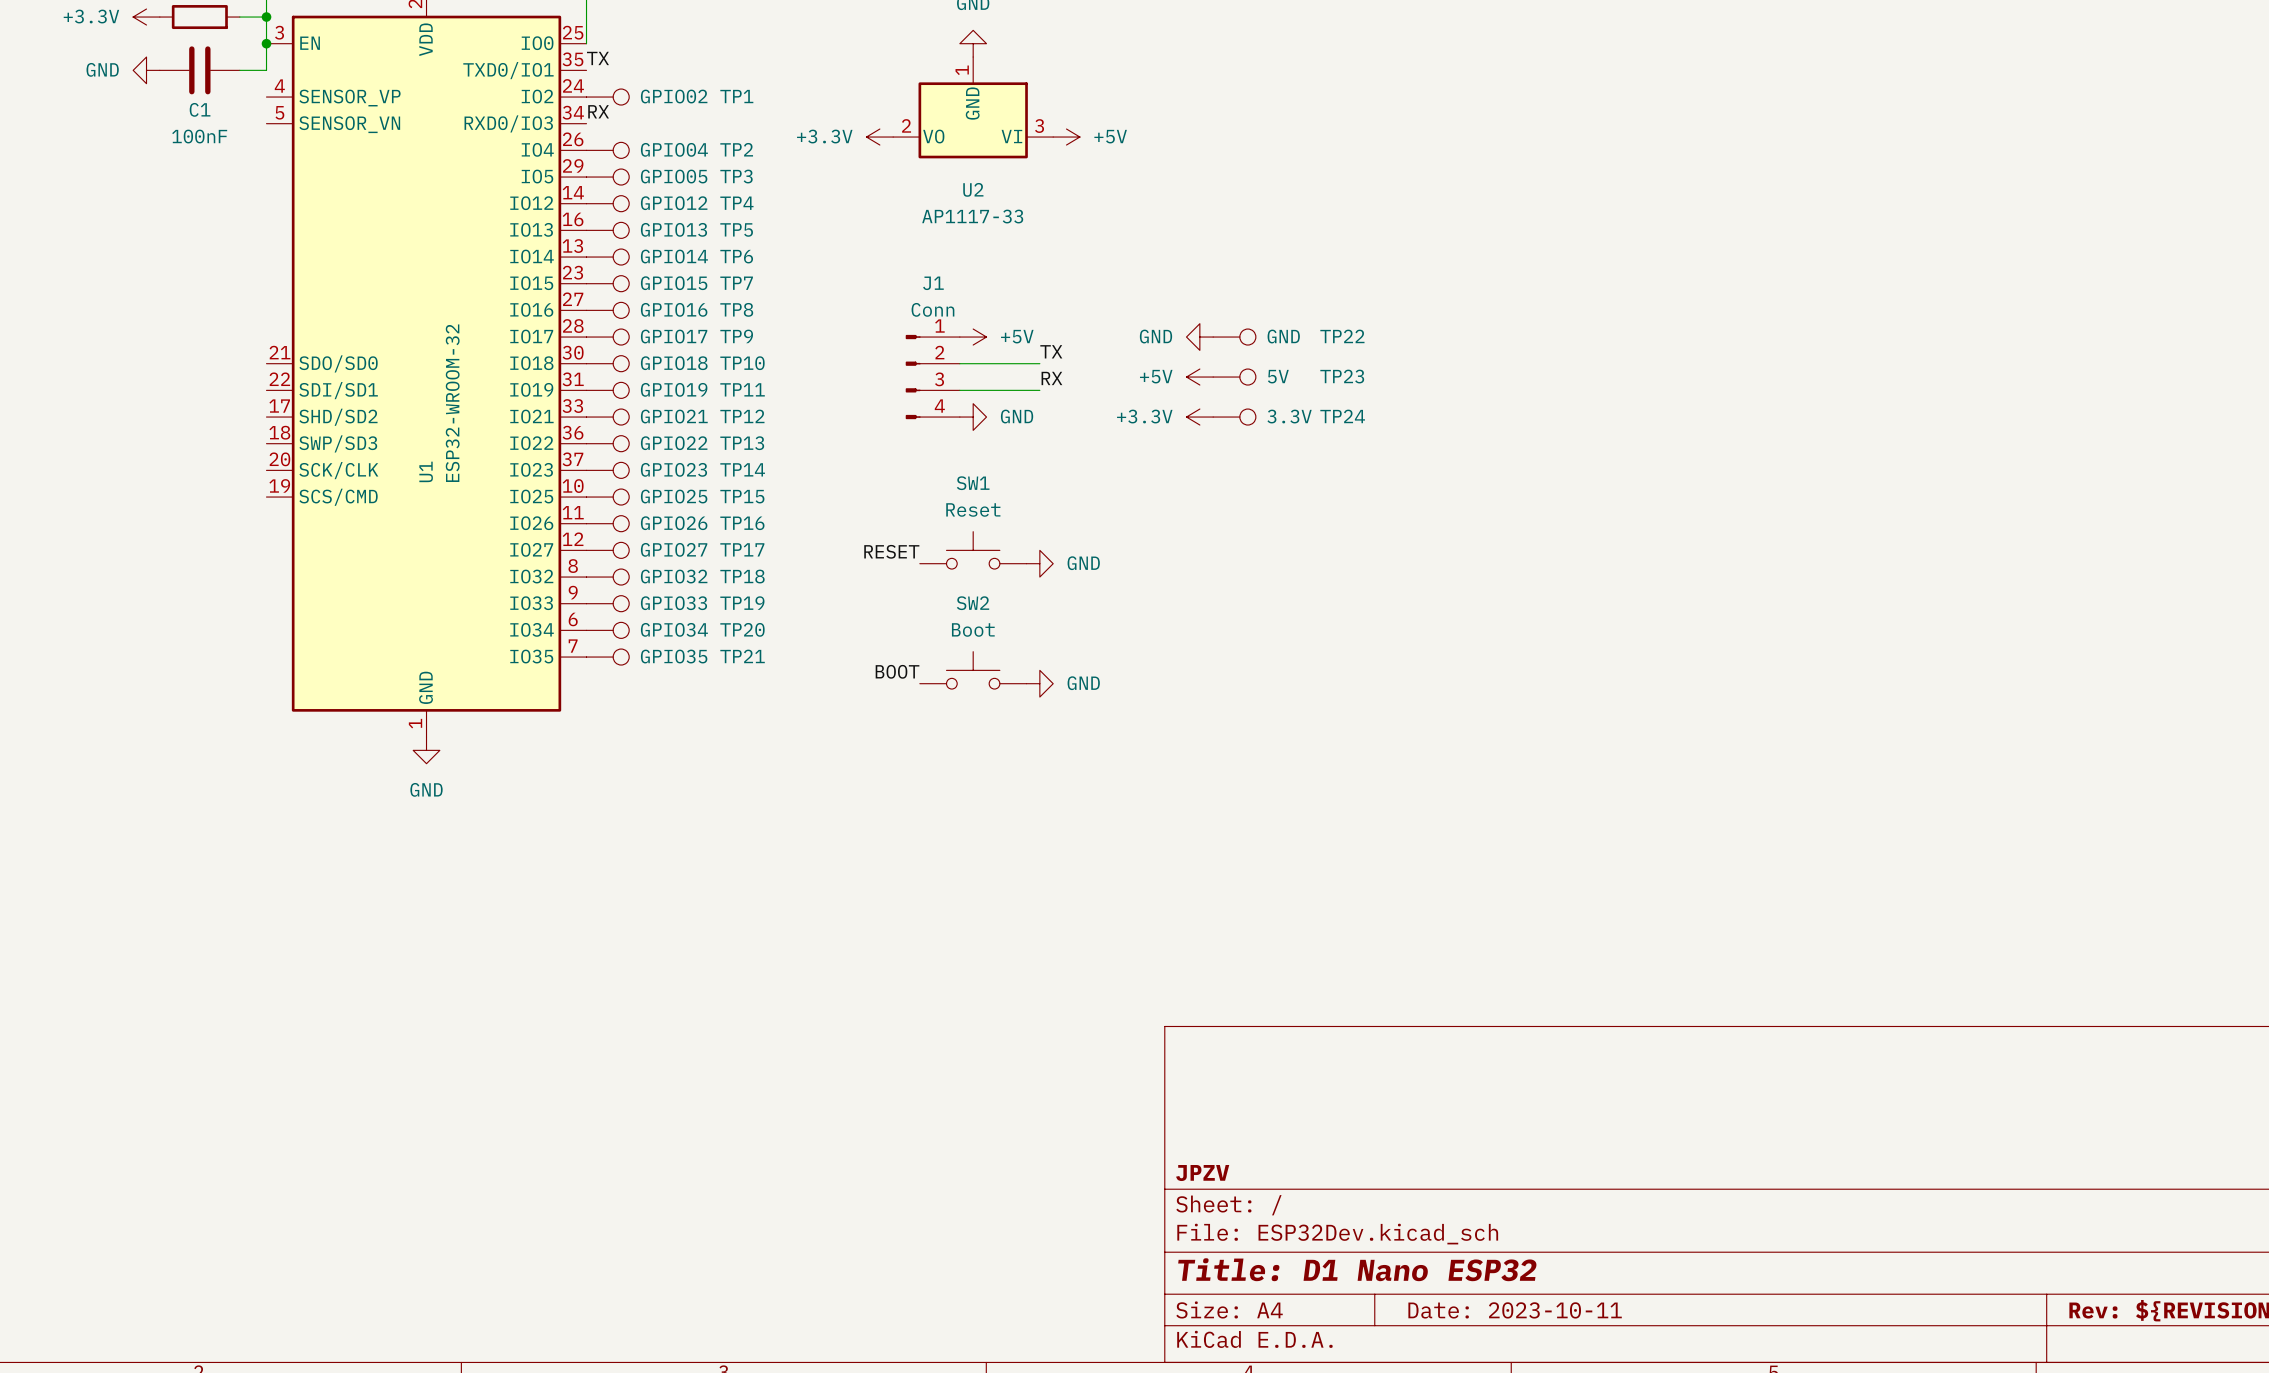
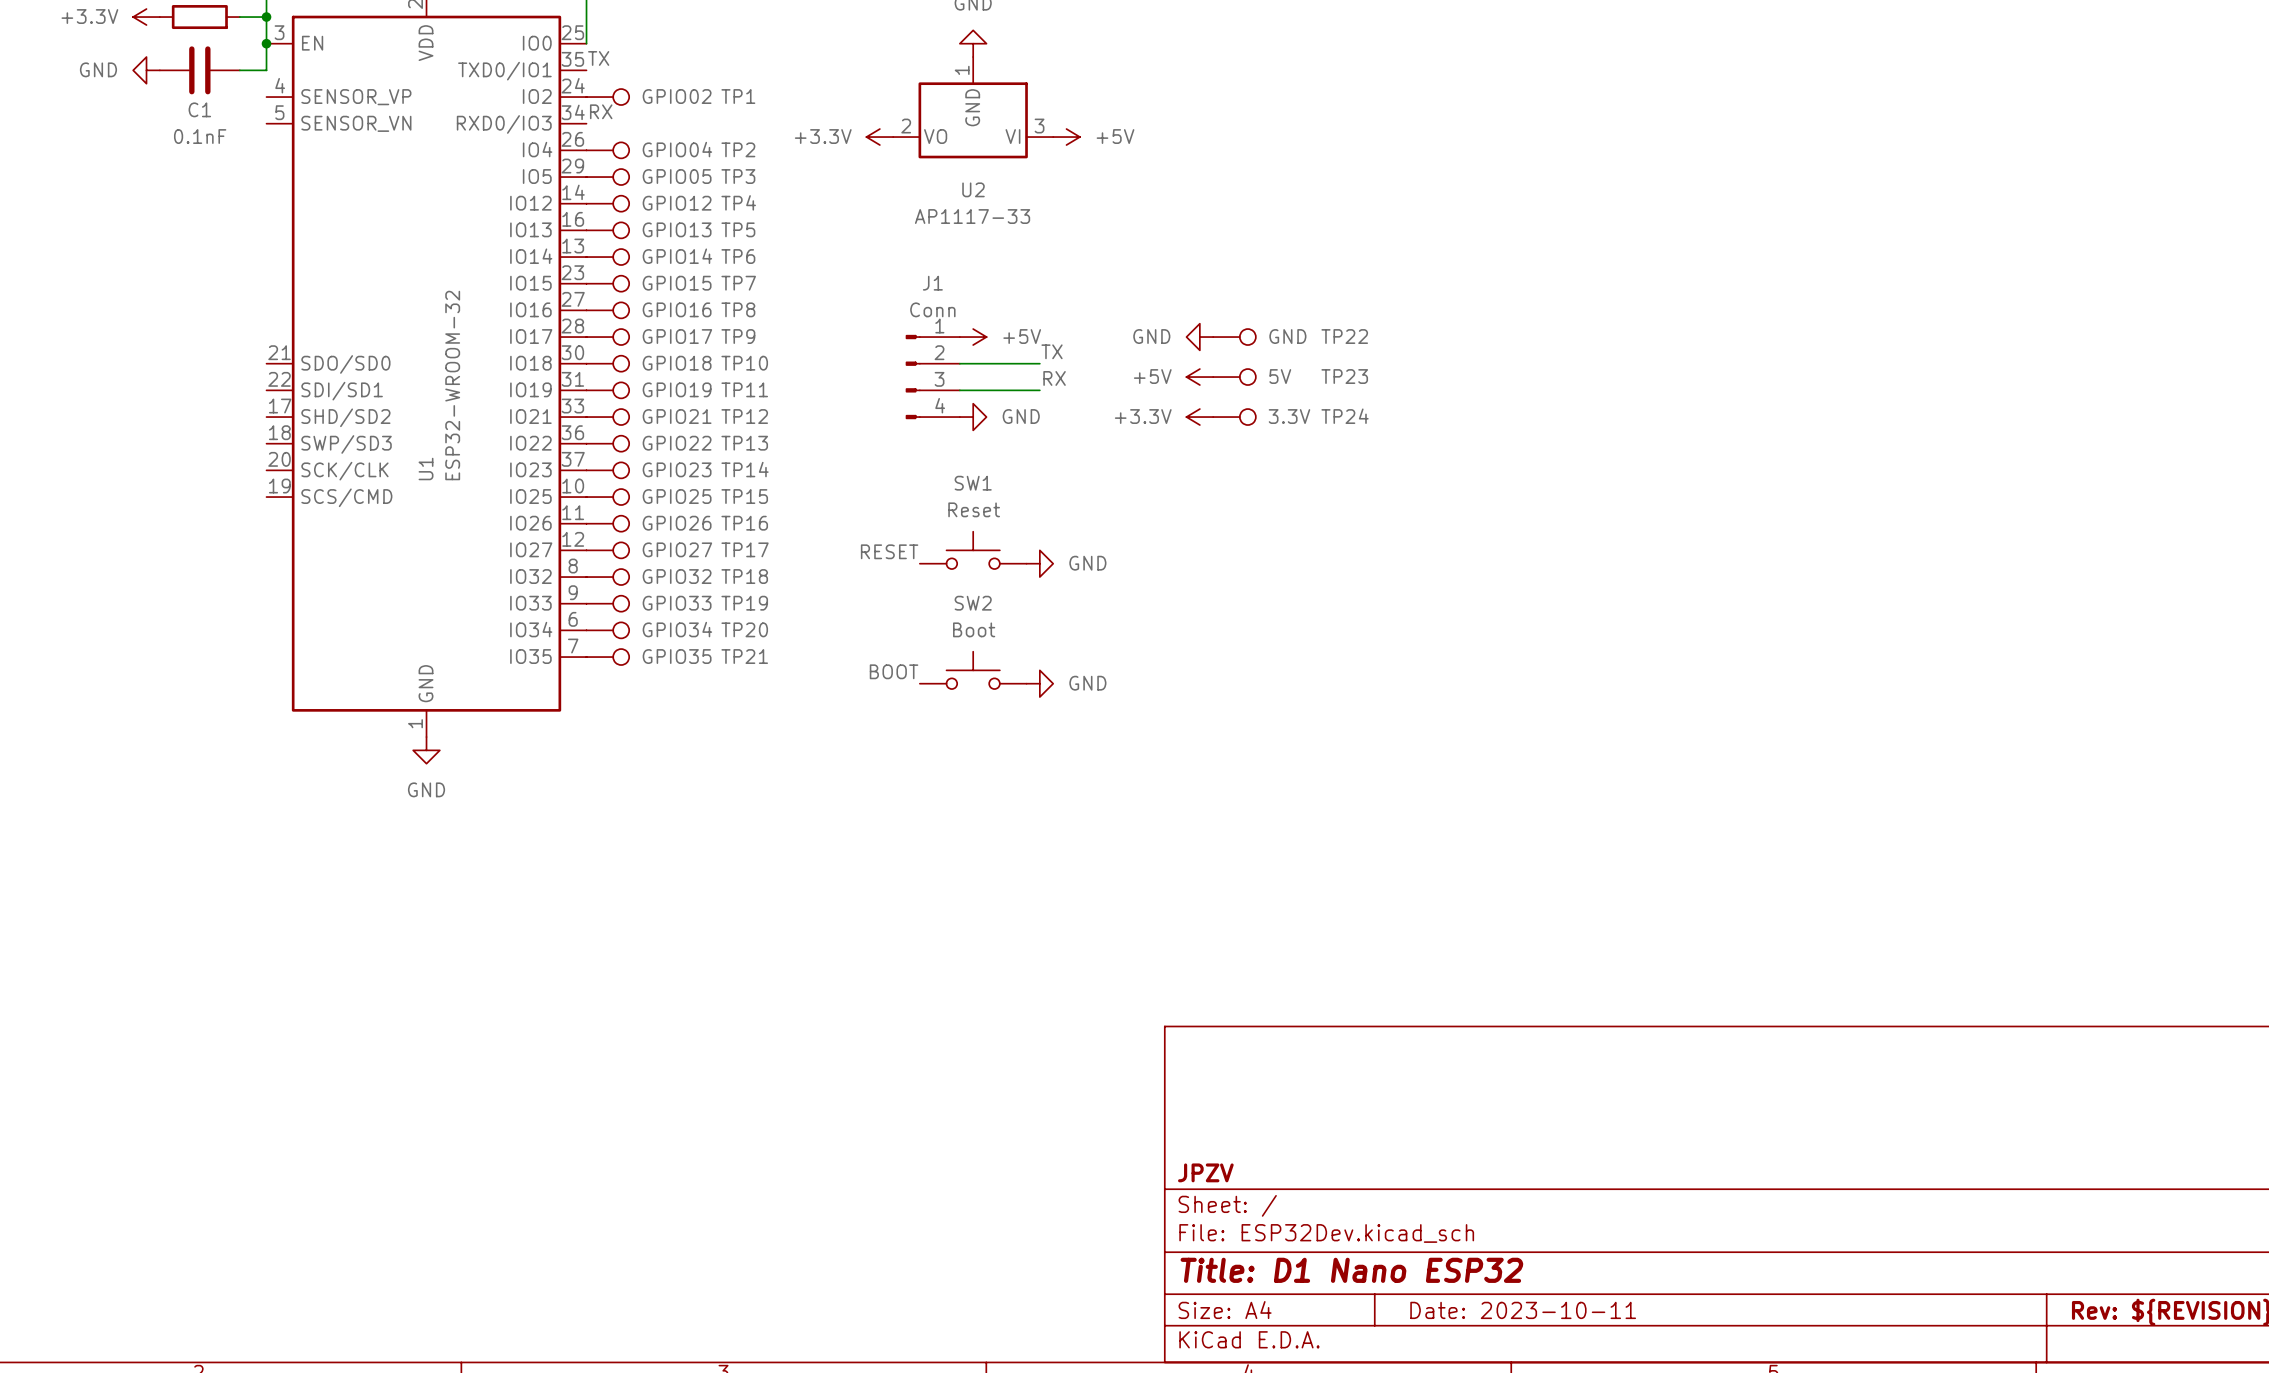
C1 value: 100nF (199, 136) -> 0.1nF (200, 136)

